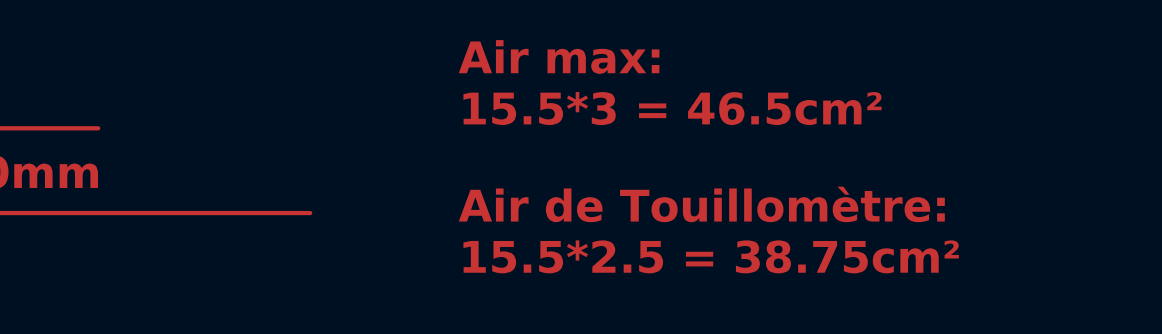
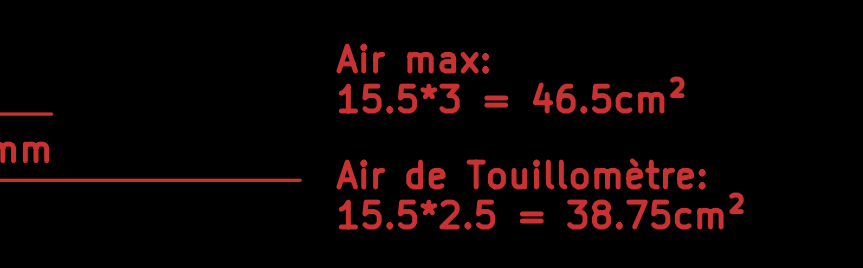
top track: none -> (217, 180) (300, 180)

